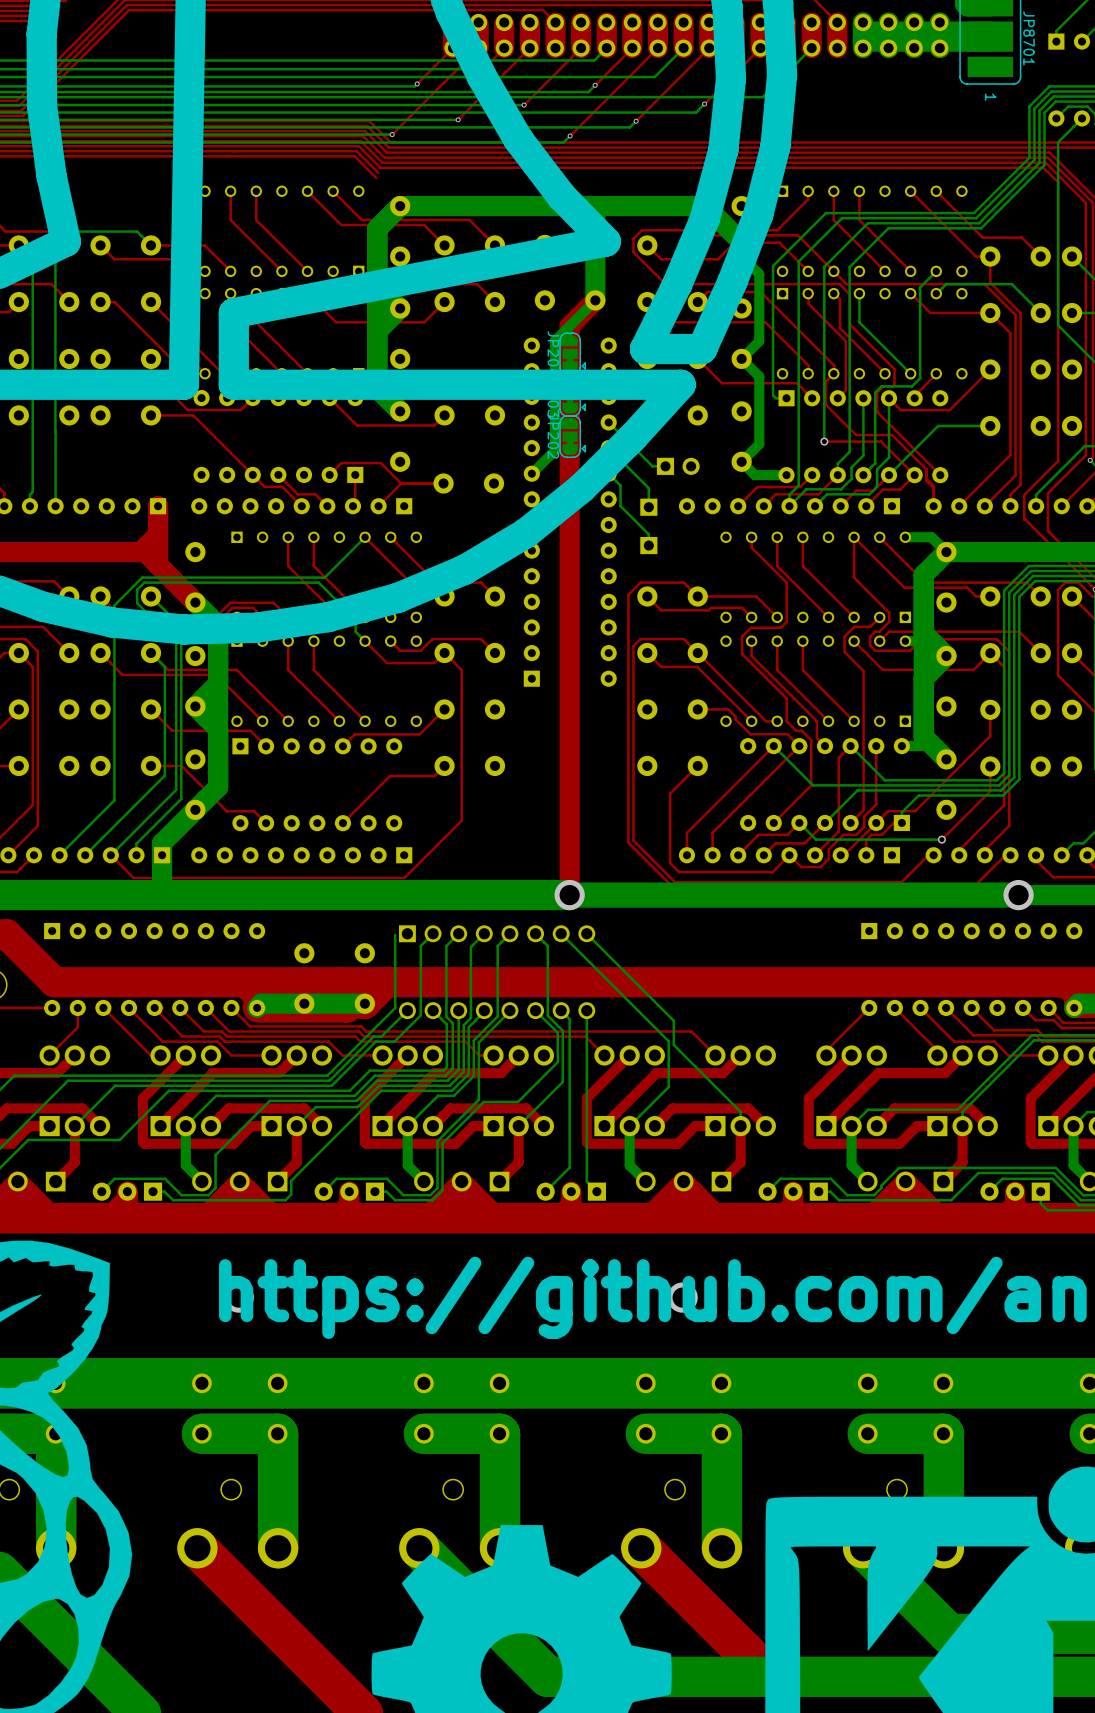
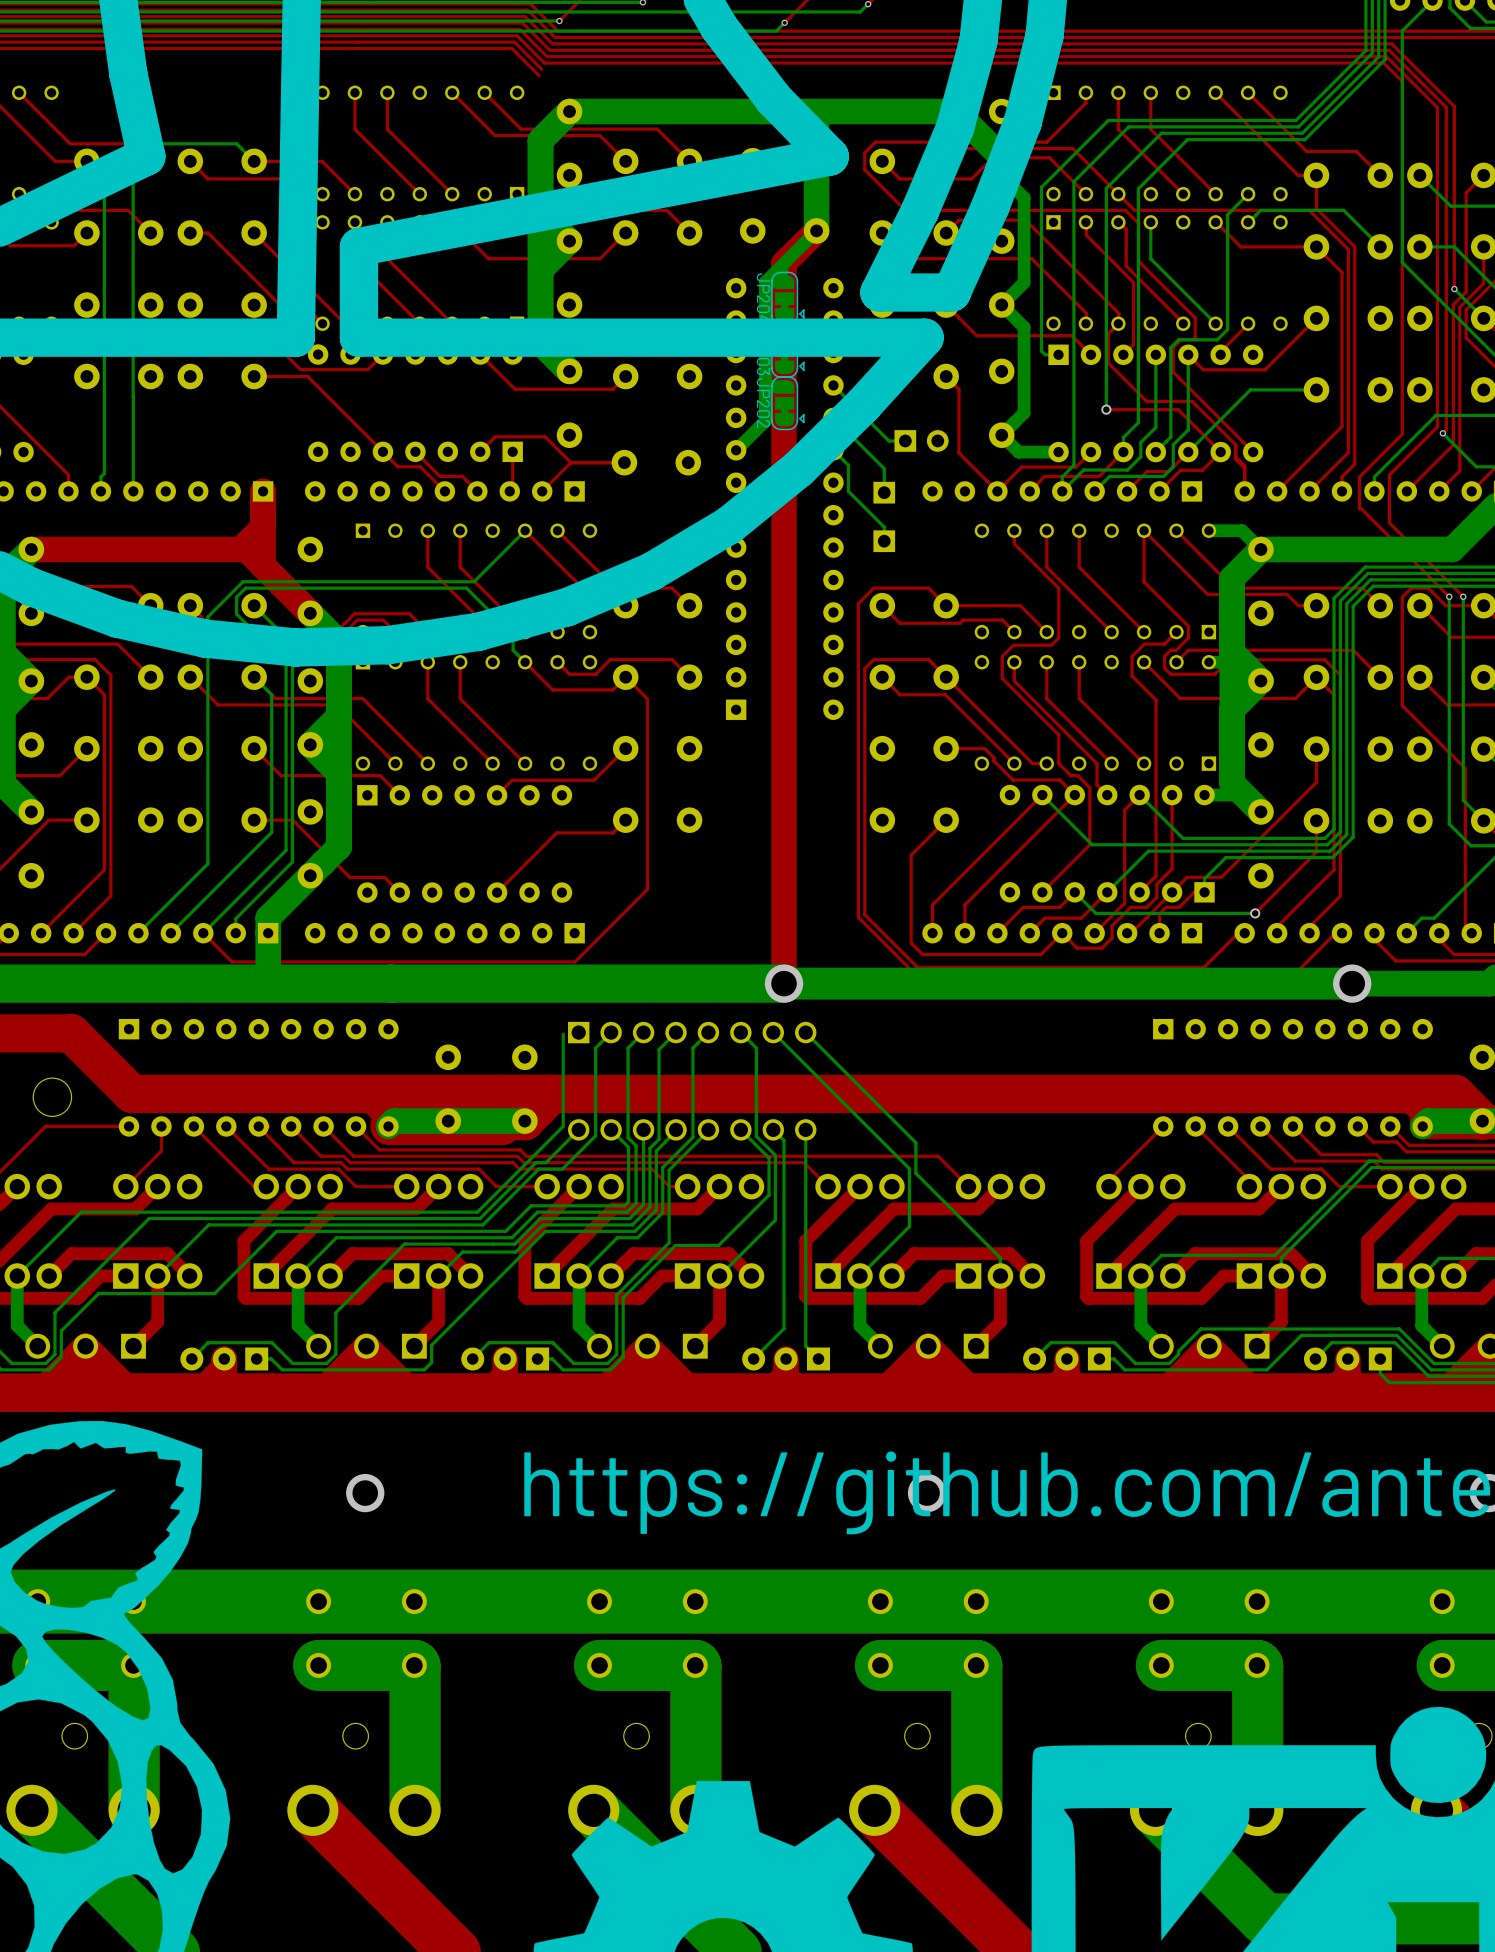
top track: none -> (946, 376) (958, 389) (958, 452) (997, 491)

